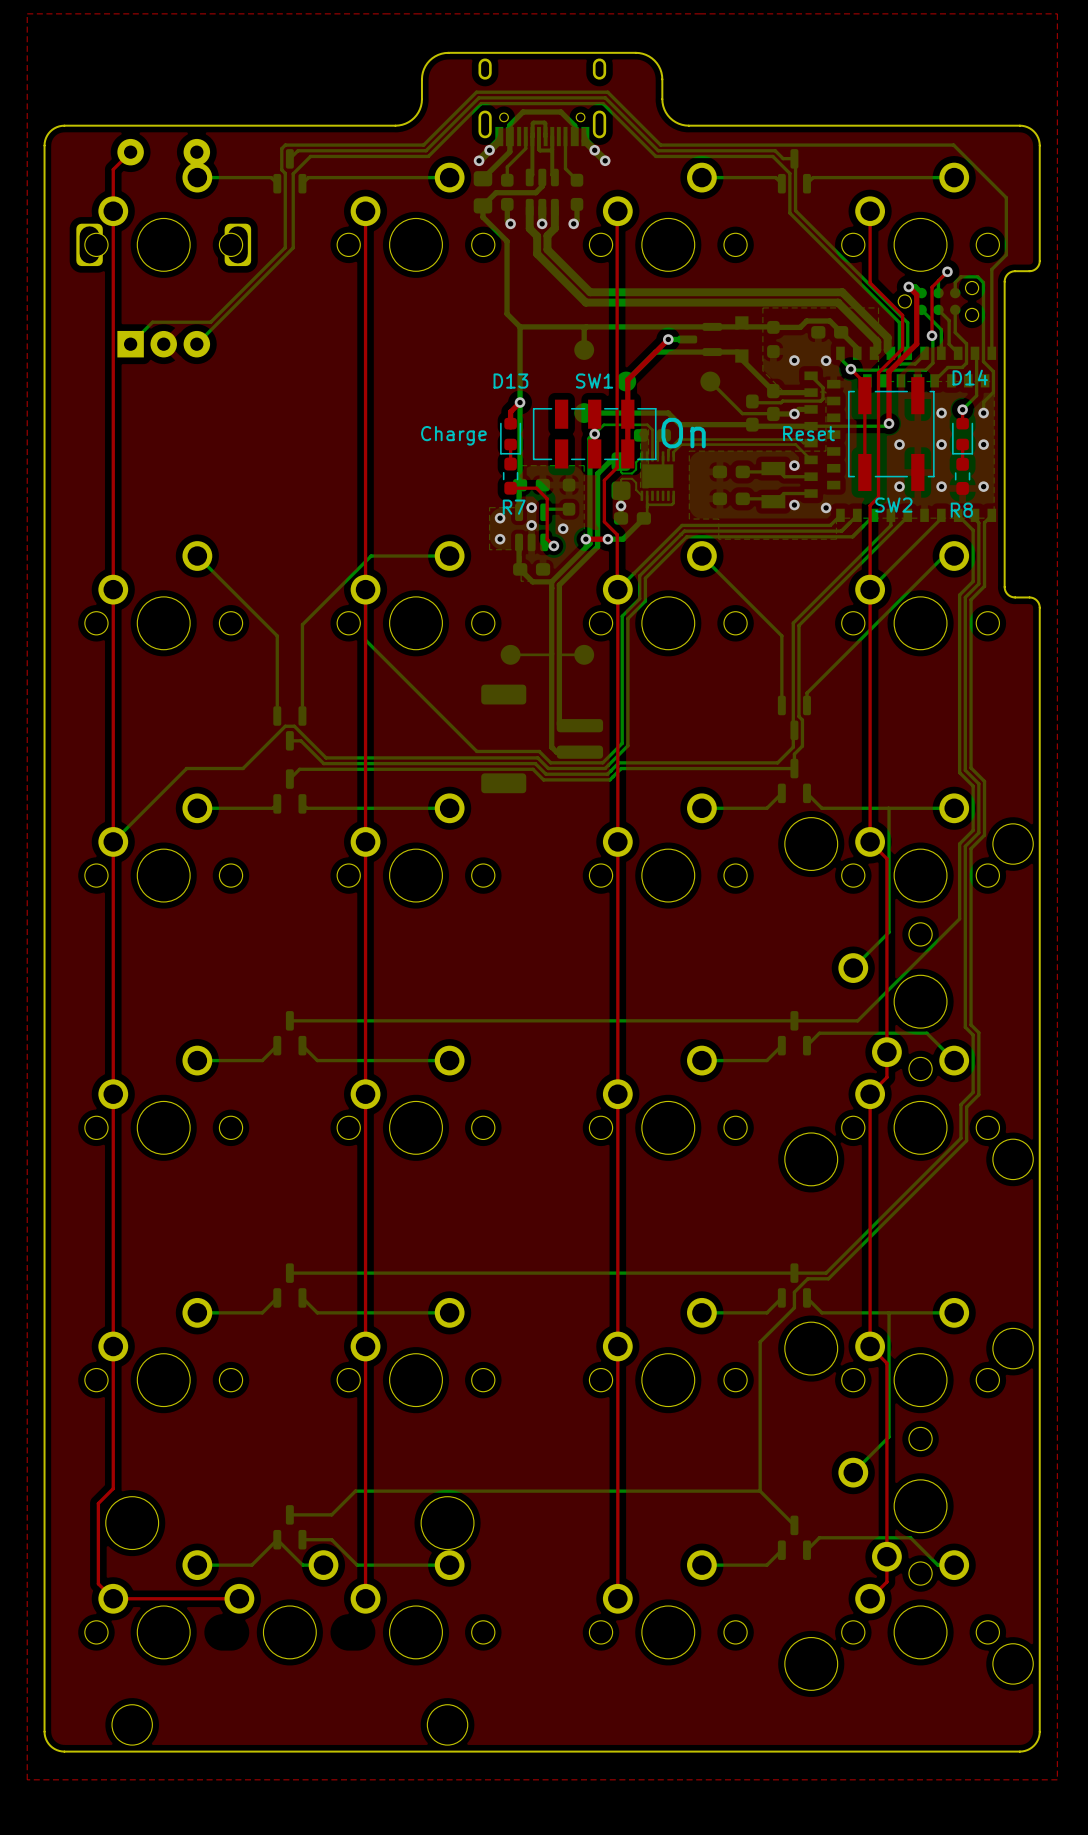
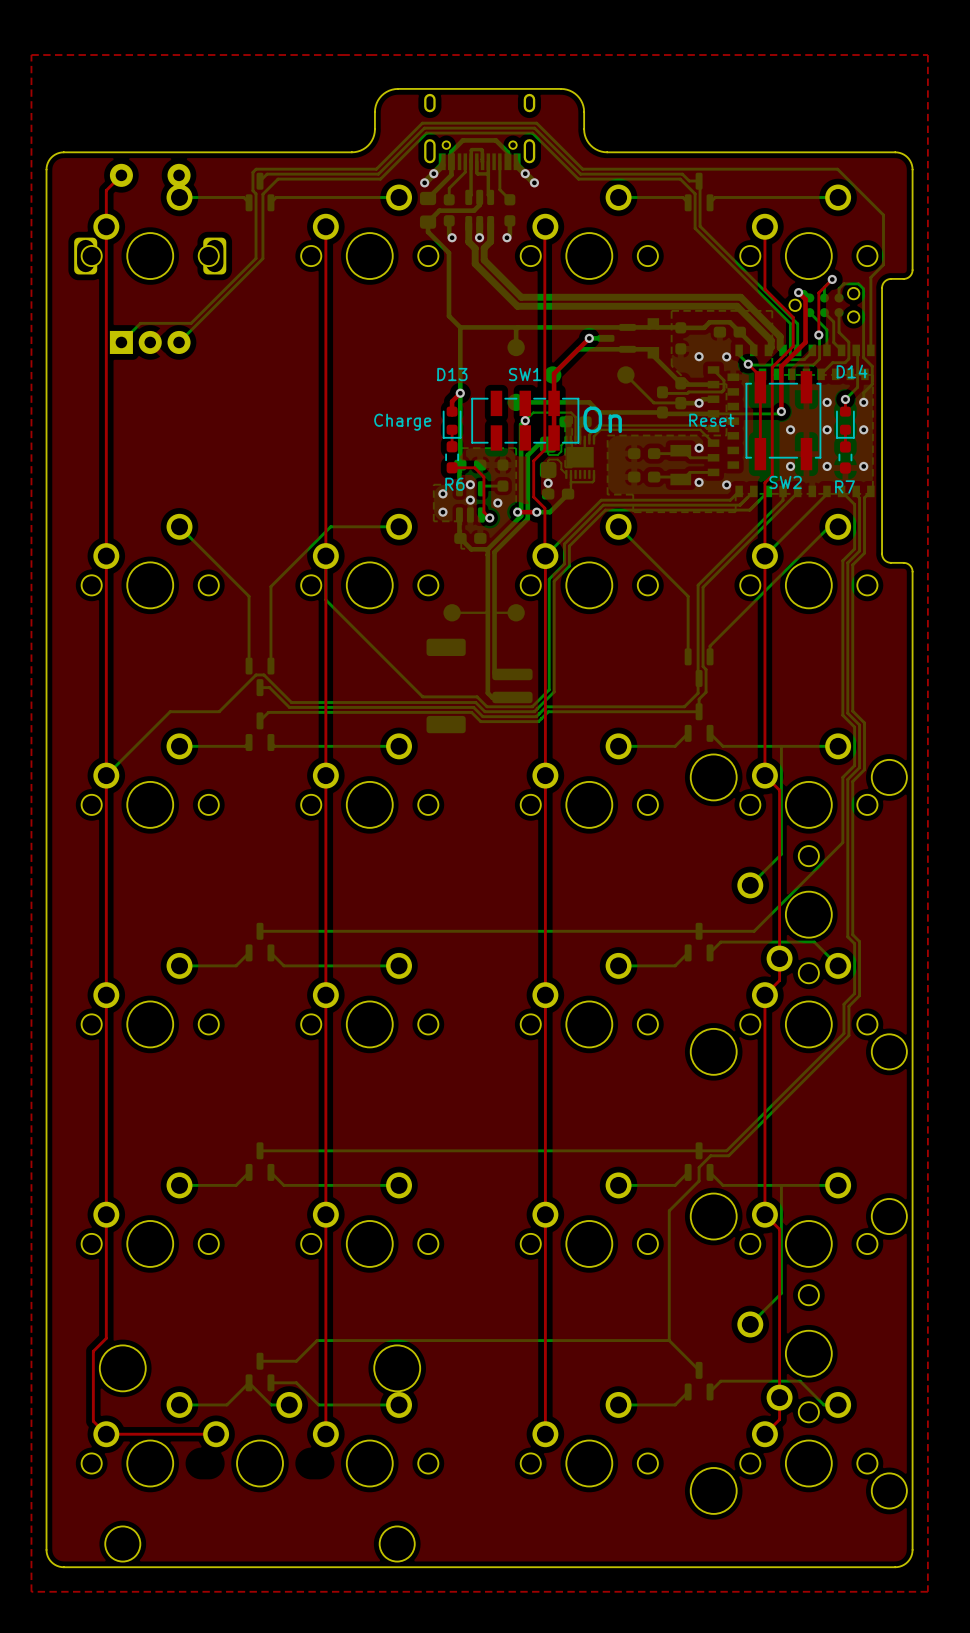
R7 name: R7 (514, 507) -> R6 (454, 484)
R8 name: R8 (961, 510) -> R7 (845, 486)

